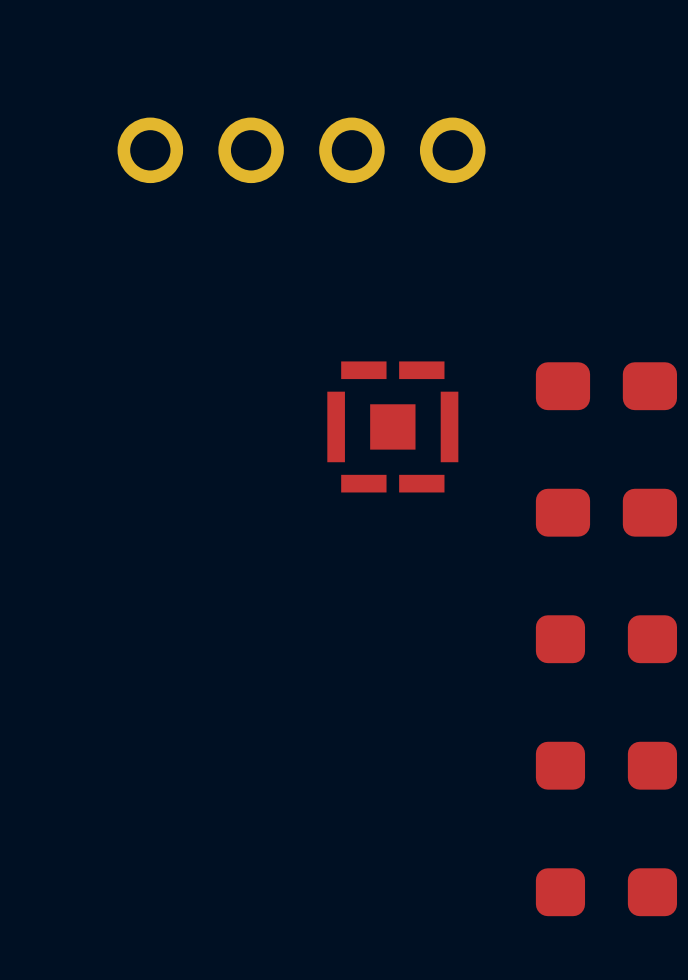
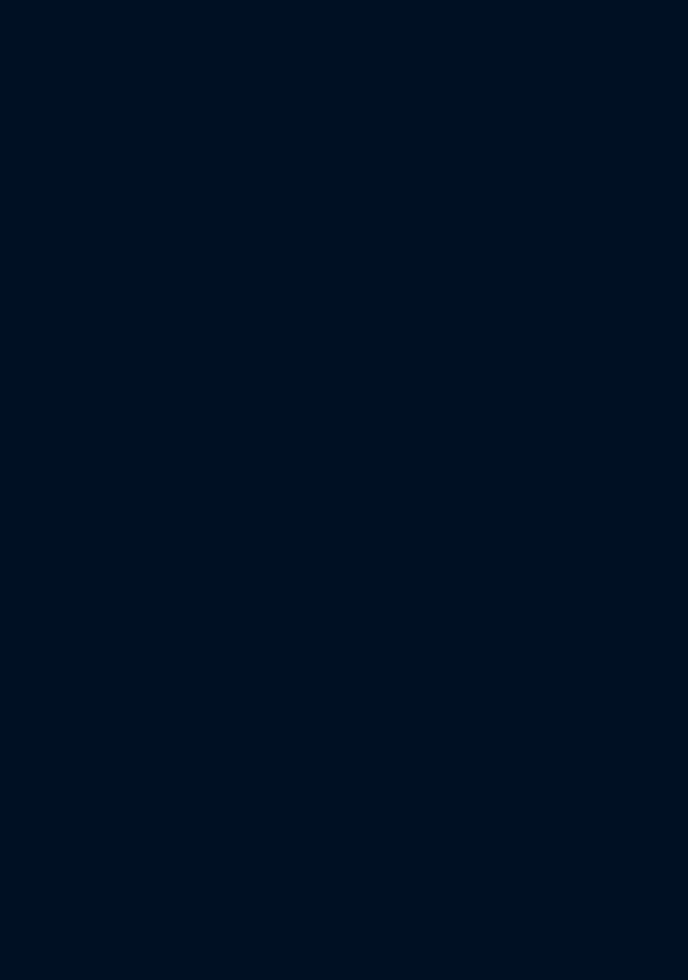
part: (301, 150) -> none
part: (606, 386) -> none
part: (392, 426) -> none
part: (606, 512) -> none
part: (606, 639) -> none
part: (606, 765) -> none
part: (606, 892) -> none

